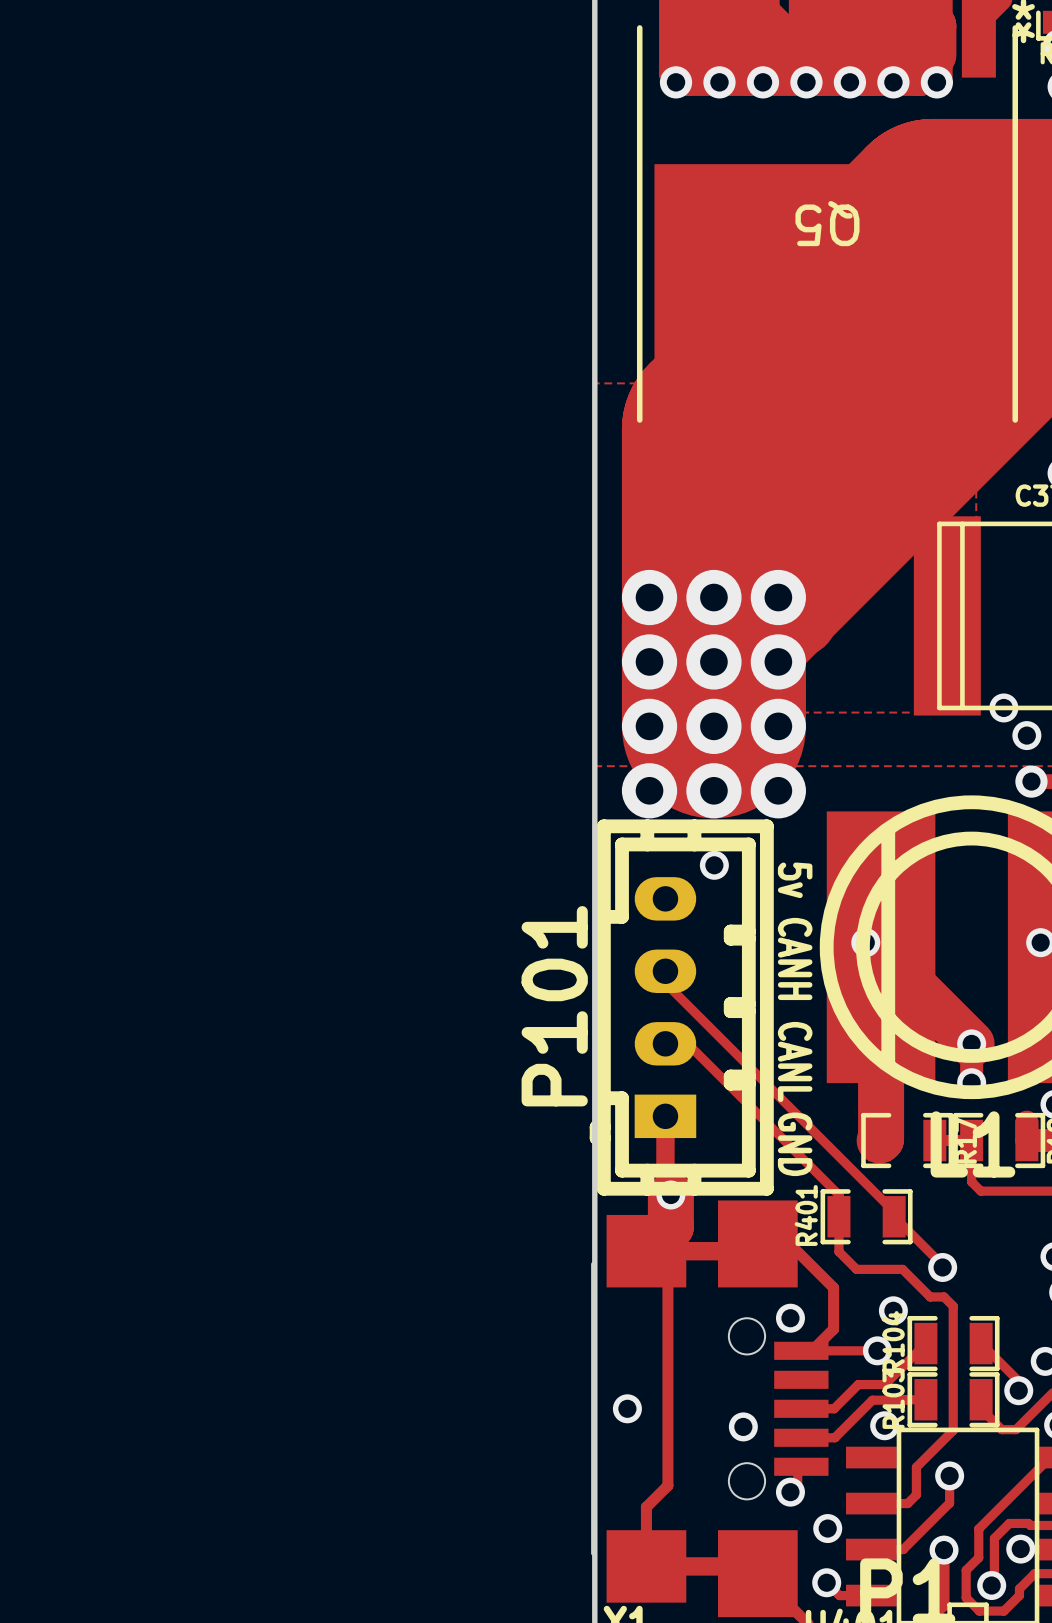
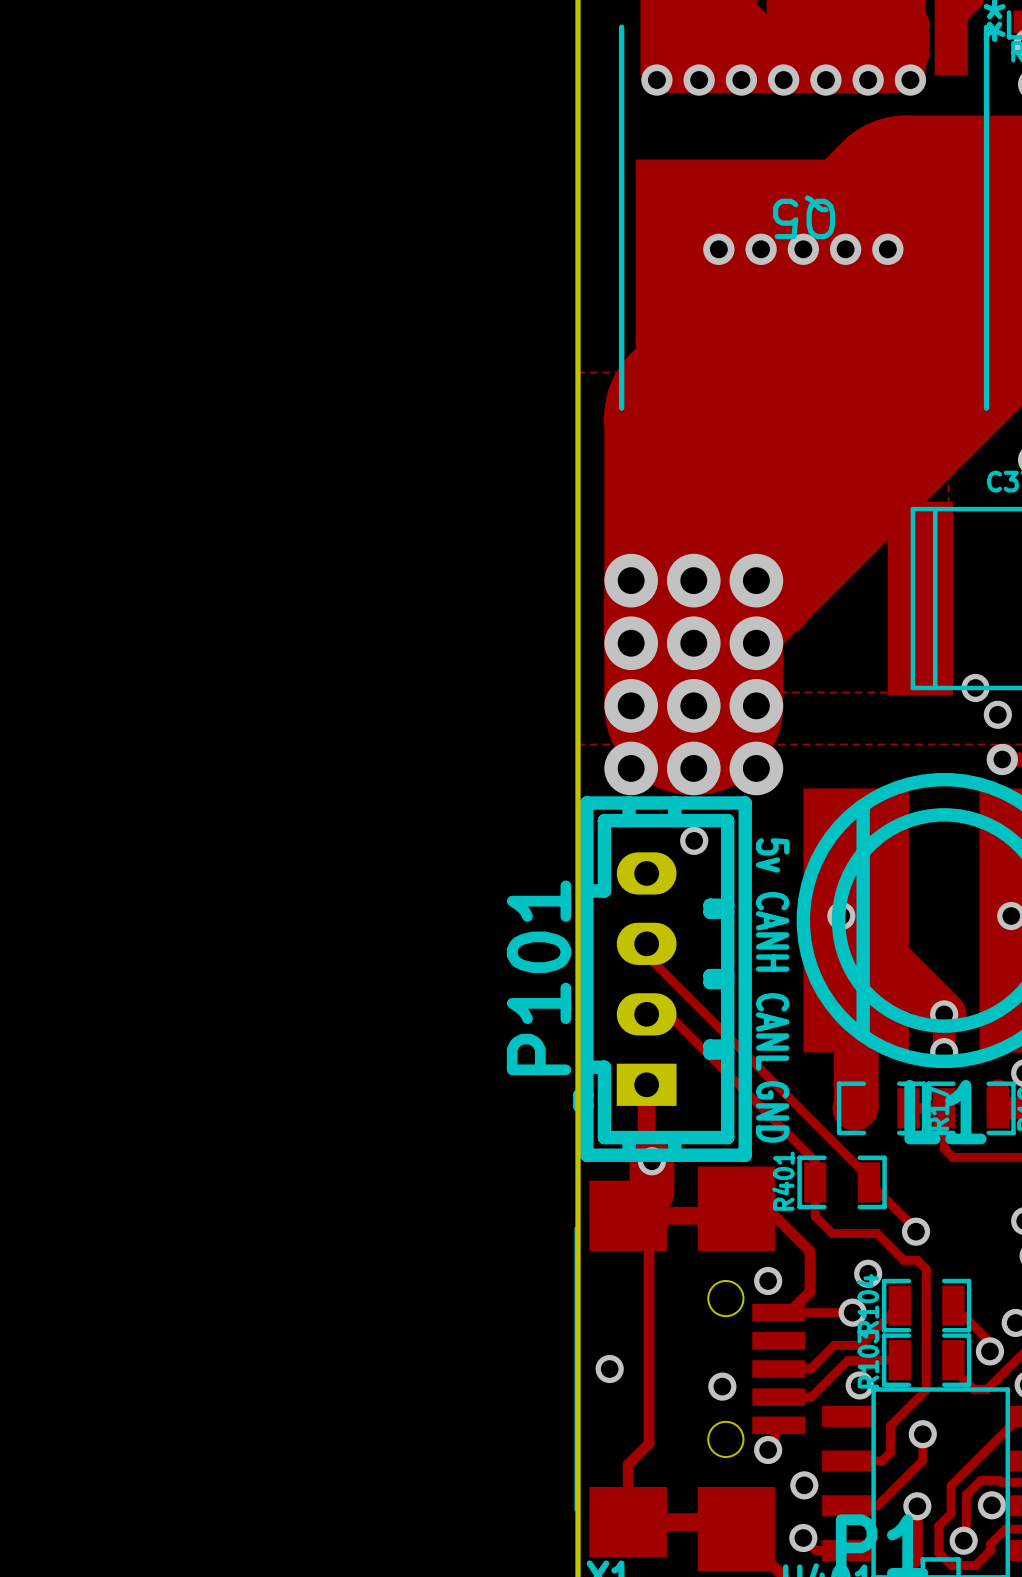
via: none -> (718, 249)
via: none -> (761, 249)
via: none -> (803, 249)
via: none -> (845, 249)
via: none -> (887, 249)

